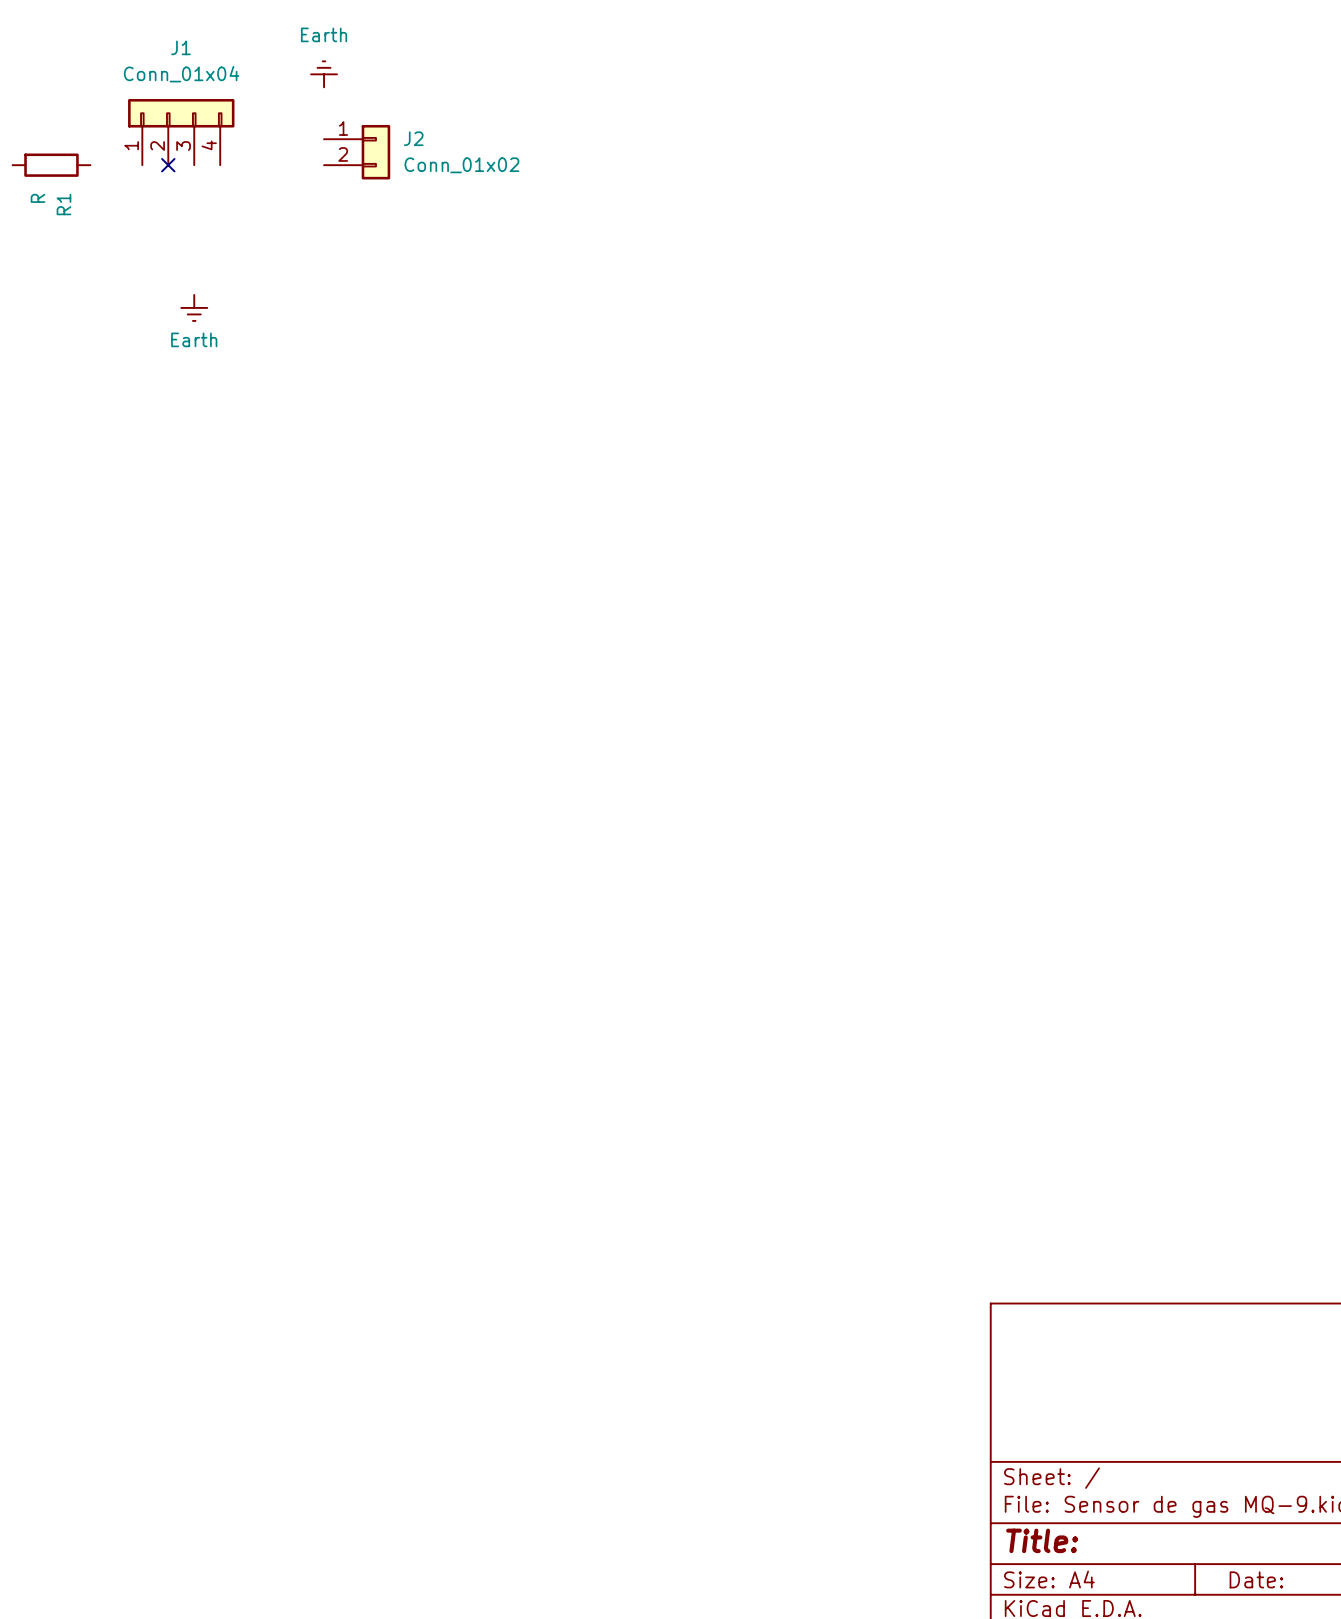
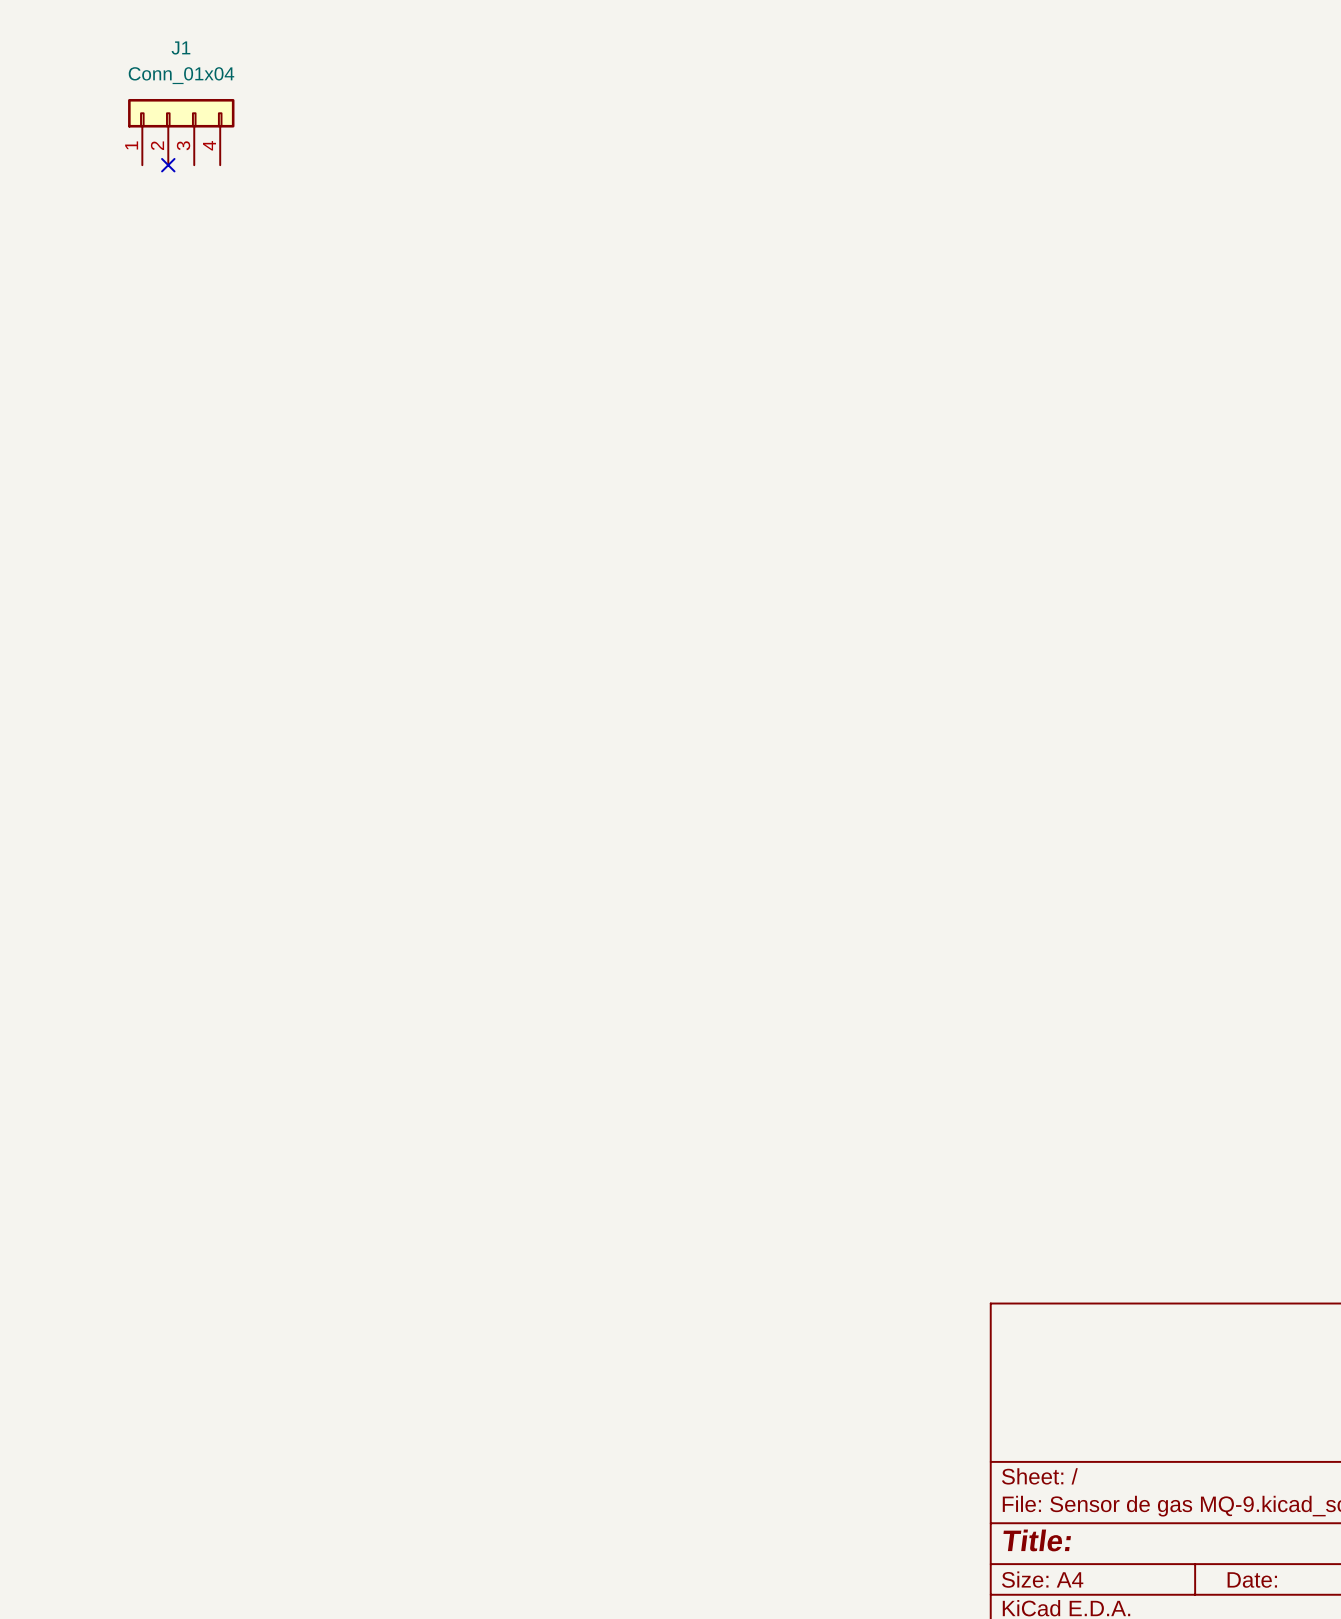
power symbol: Earth (324, 74) -> none
J2: Conn_01x02 (357, 152) -> none
R1: R (51, 165) -> none
power symbol: Earth (194, 307) -> none

